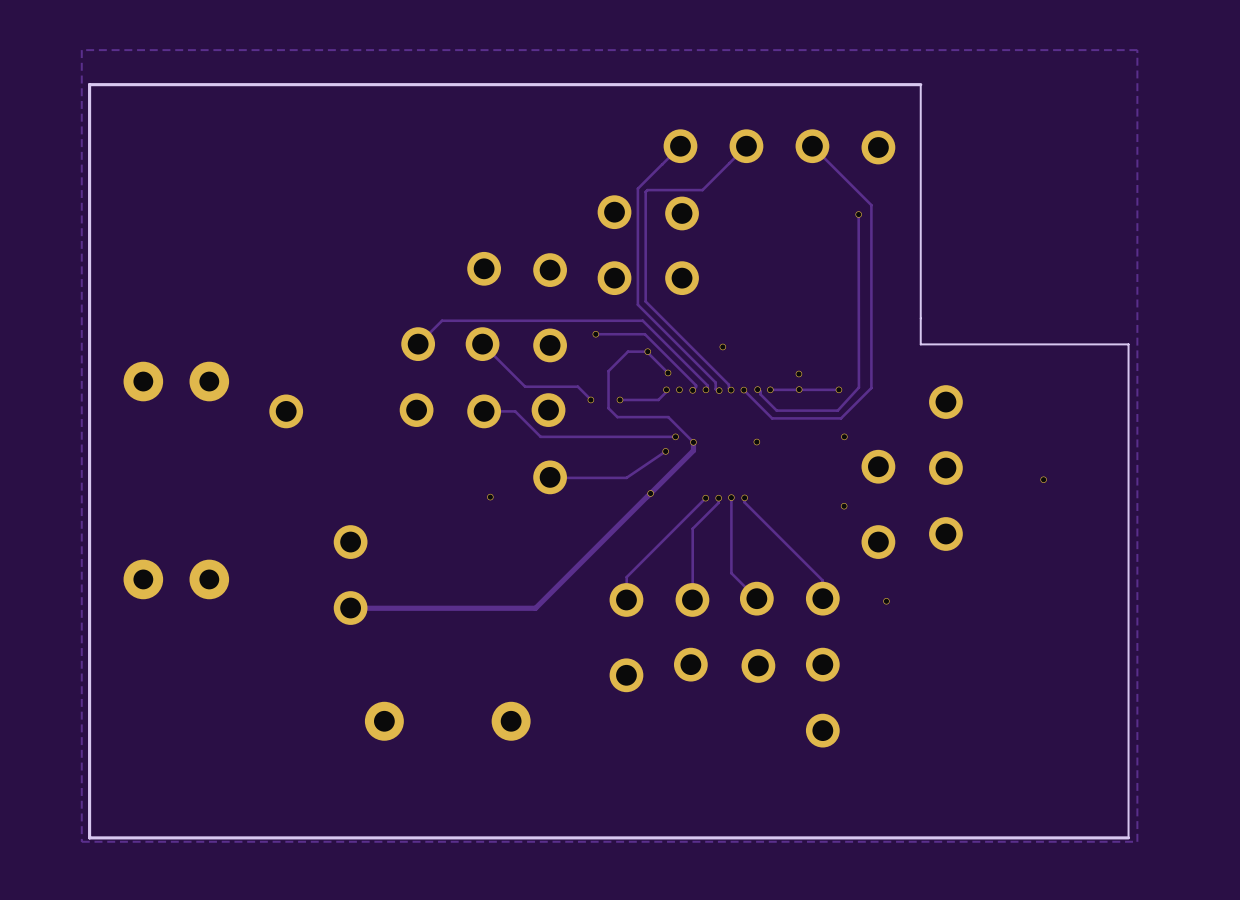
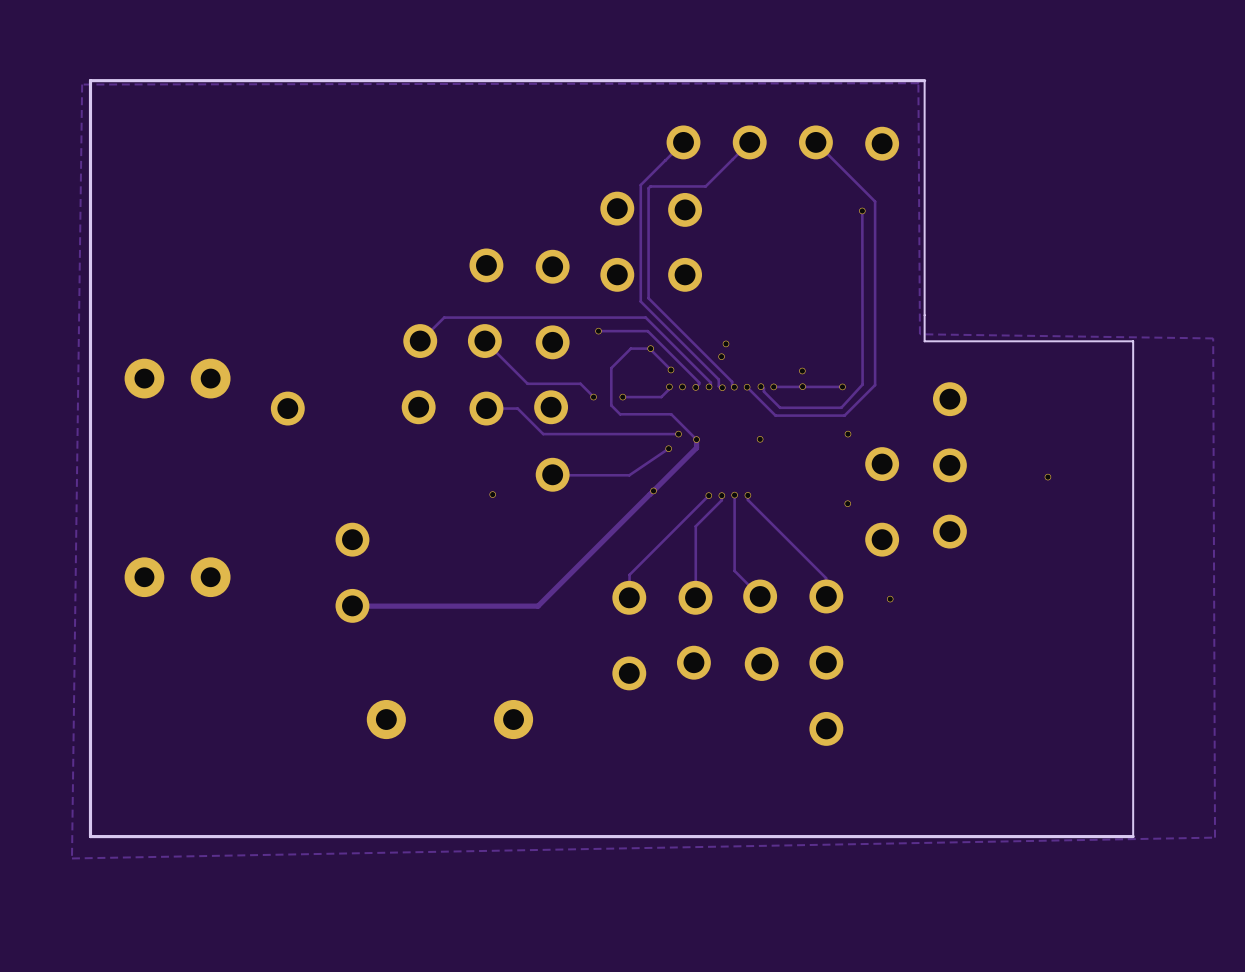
zone outline: (1137, 50) (81, 50) (81, 841) (1137, 841) (1137, 50) -> (918, 81) (919, 334) (1213, 338) (1215, 837) (71, 858) (82, 84) (918, 81)
via: none -> (721, 356)

